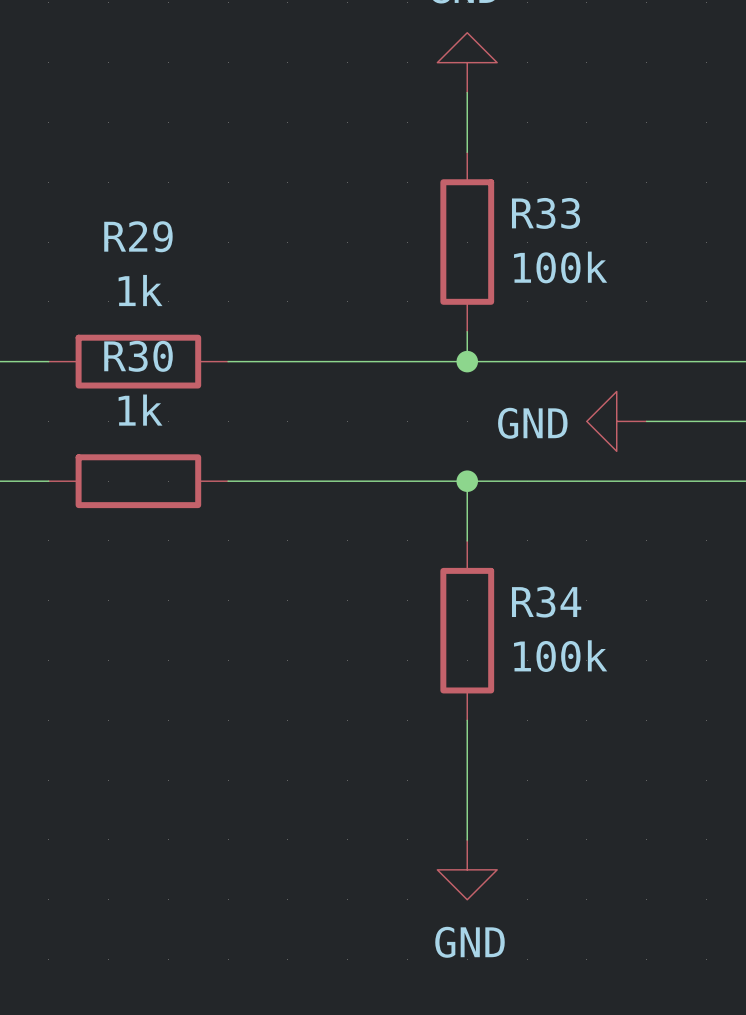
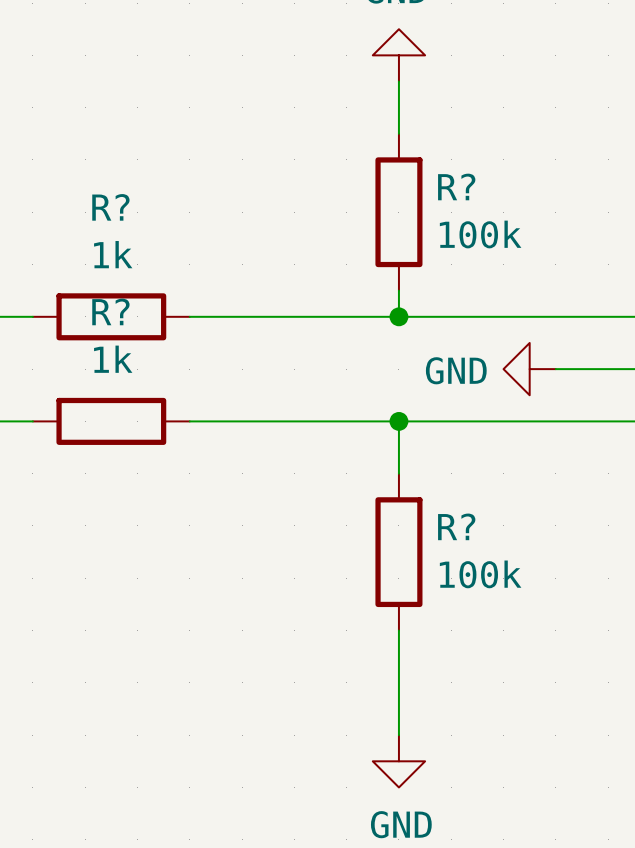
R33 name: R33 (546, 213) -> R? (456, 186)
R29 name: R29 (138, 236) -> R? (110, 207)
R30 name: R30 (138, 356) -> R? (110, 311)
R34 name: R34 (546, 602) -> R? (456, 526)

